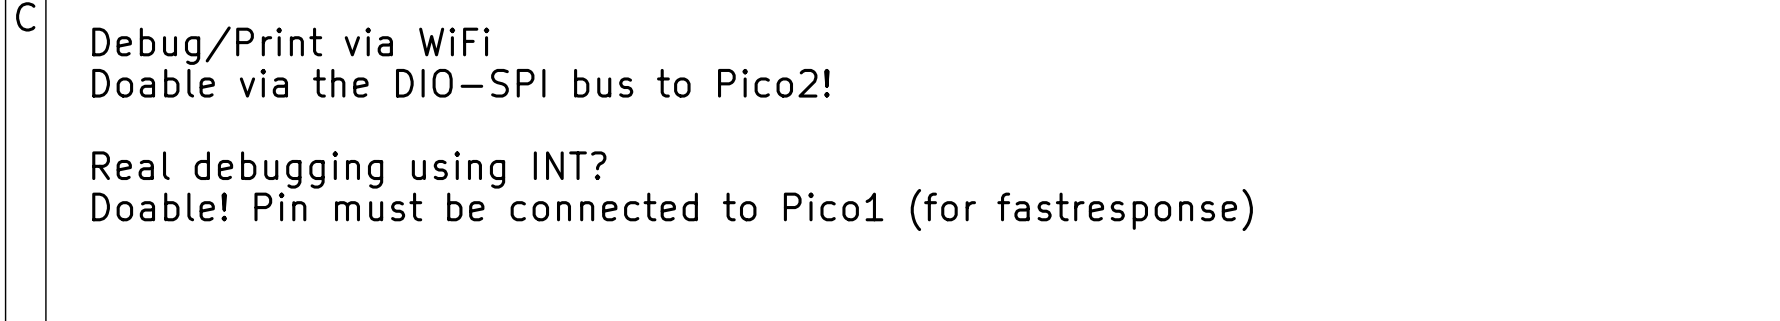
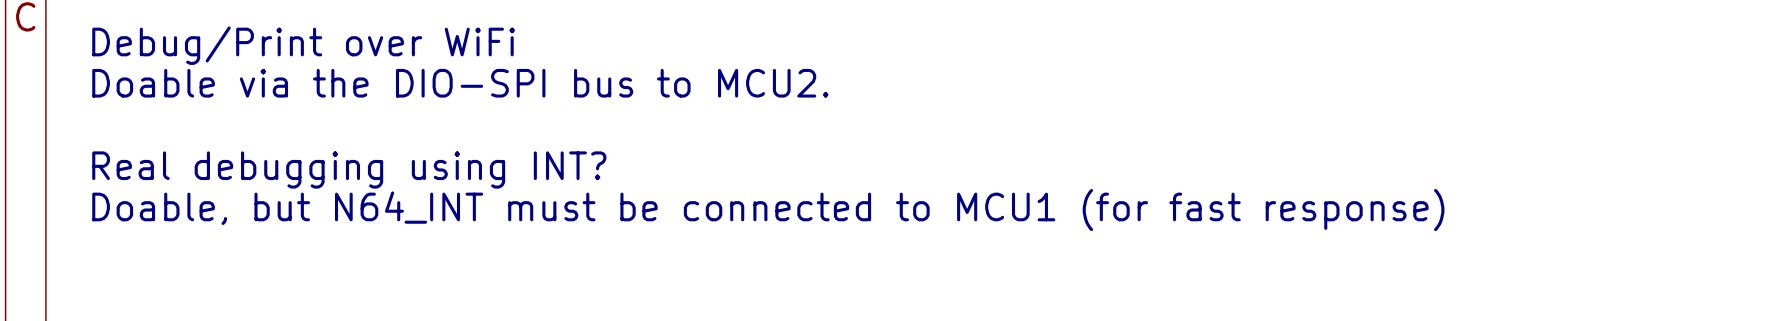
text: Debug/Print via WiFi (290, 45) -> Debug/Print over WiFi (303, 45)
text: Doable via the DIO-SPI bus to Pico2! (460, 83) -> Doable via the DIO-SPI bus to MCU2. (460, 83)
text: Doable! Pin must be connected to Pico1 (for fastresponse) (672, 210) -> Doable, but N64_INT must be connected to MCU1 (for fast response) (768, 210)

